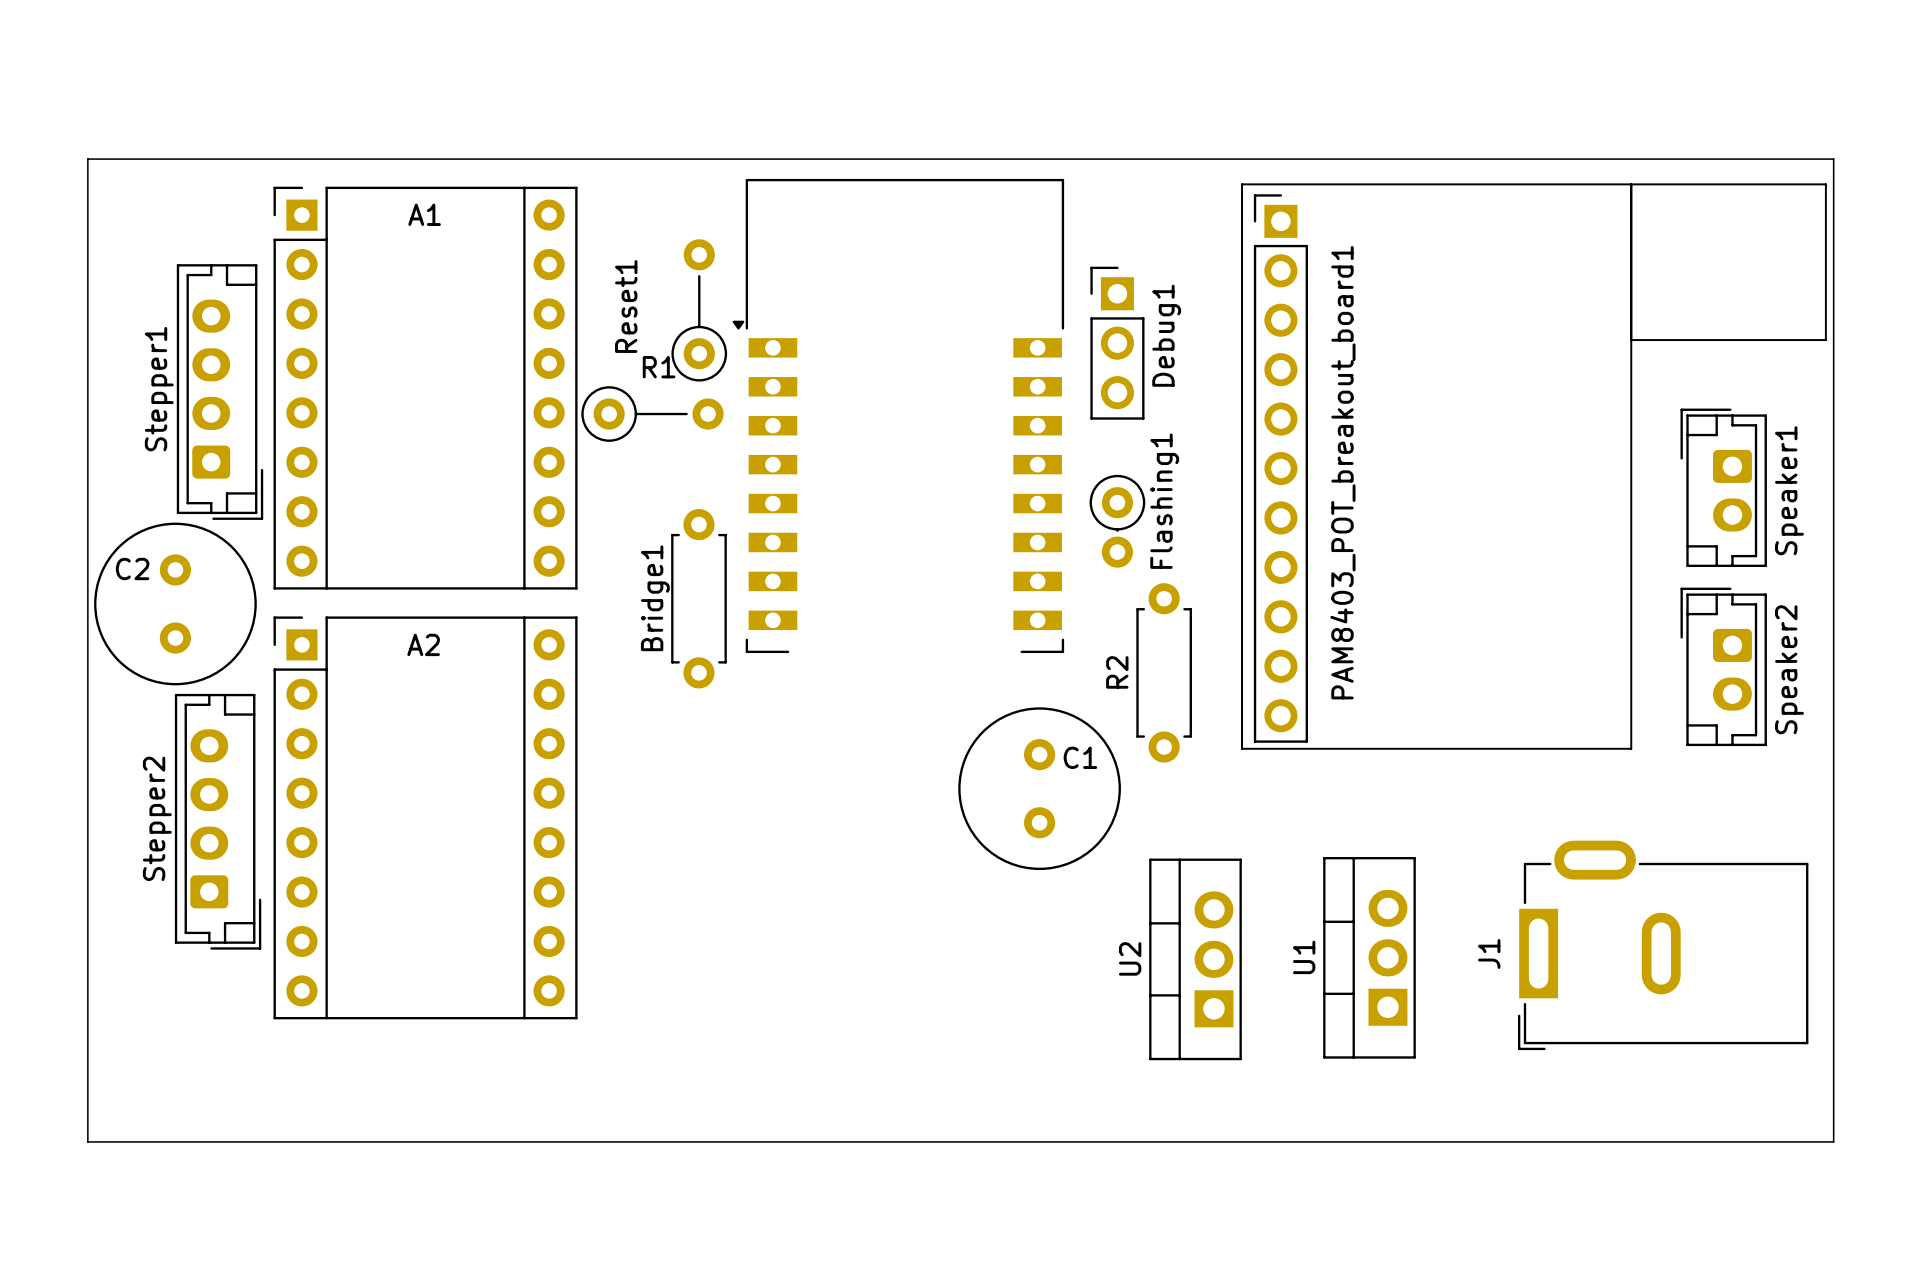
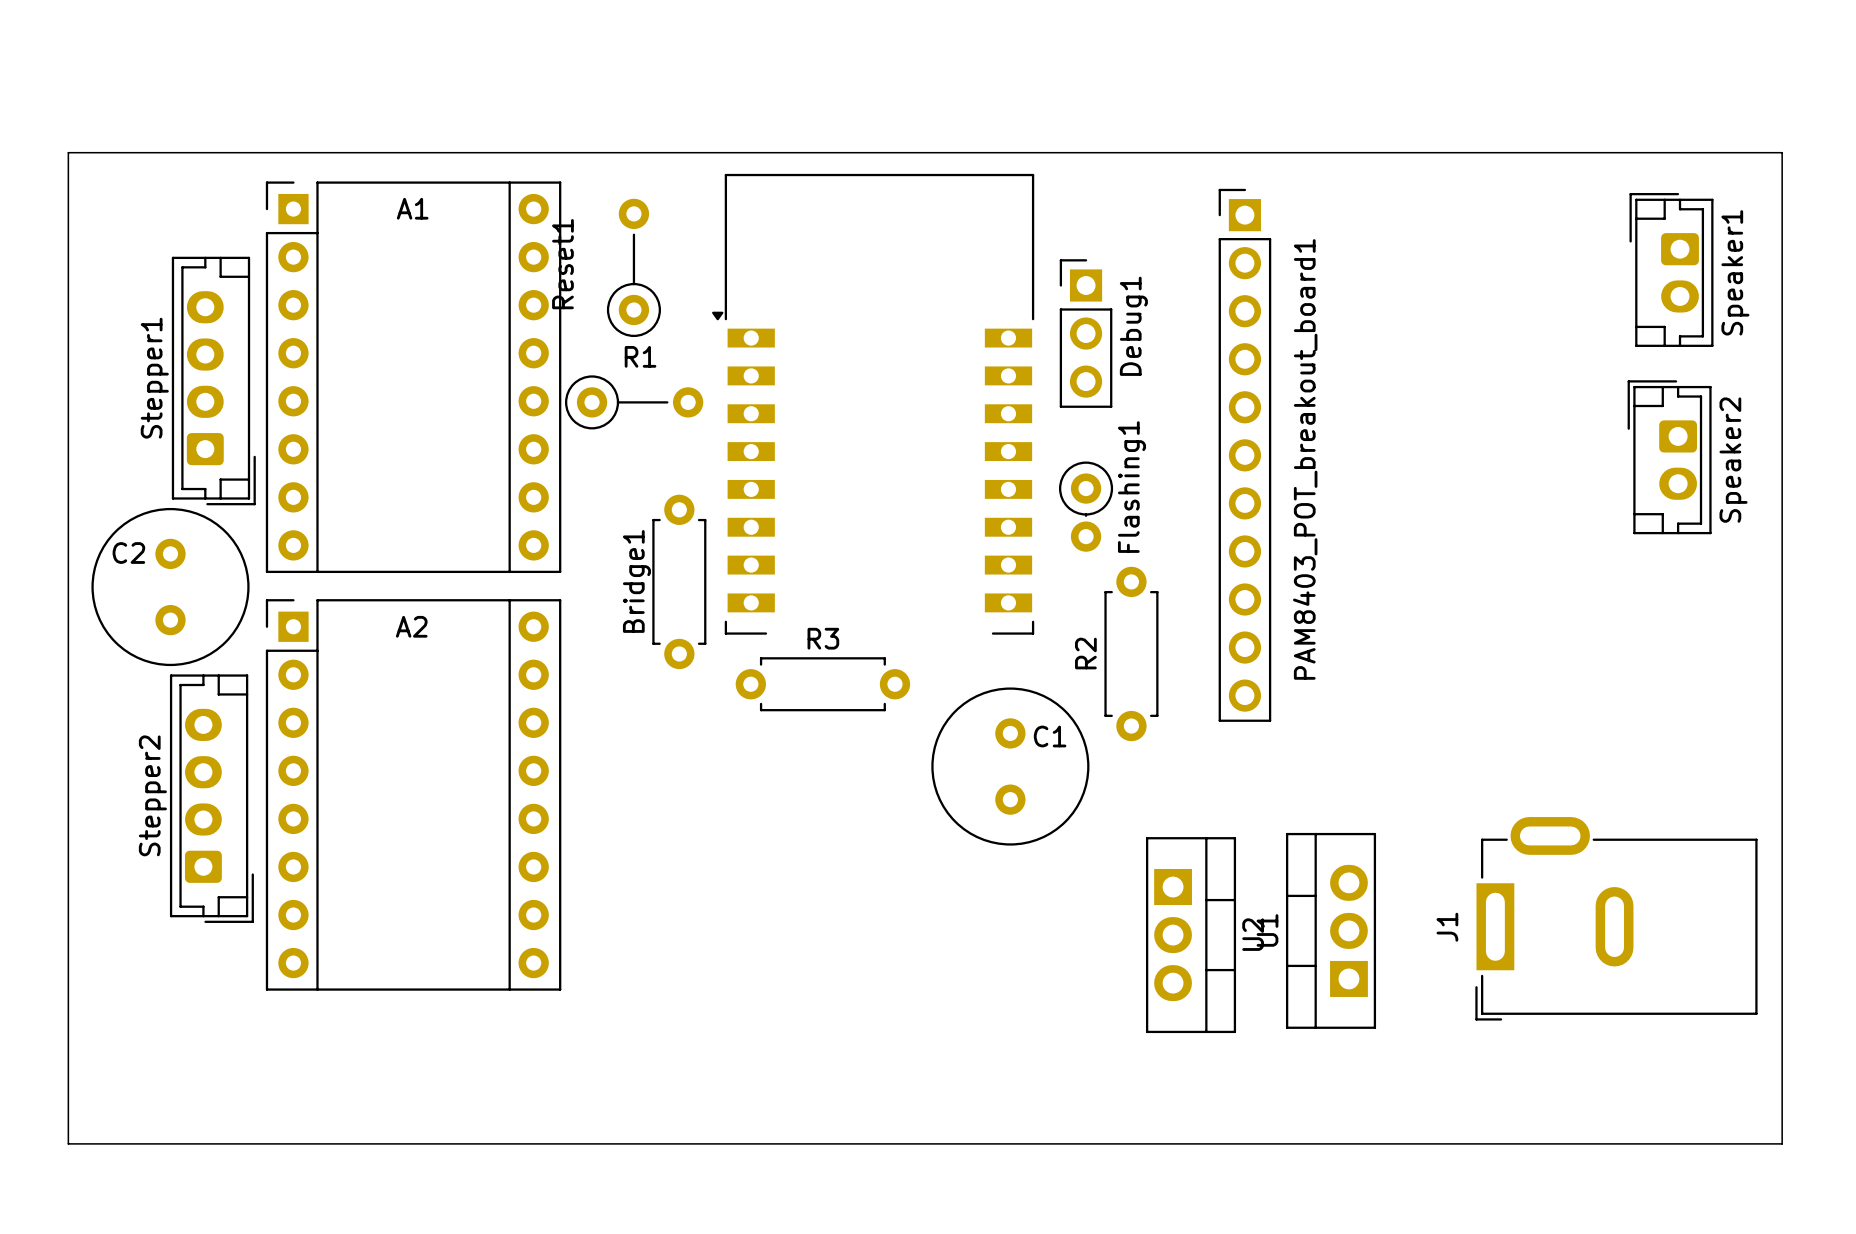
board edge: (1833, 159) (87, 159) (87, 1141) (1833, 1141) -> (1782, 154) (1782, 152) (68, 152) (68, 1143) (1782, 1143) (1782, 1109)
line: (1631, 184) (1631, 748) (1242, 748) (1242, 184) (1825, 184) (1825, 340) (1631, 340) -> none
Reset1 position: (699, 310) -> (633, 267)
Speaker1 position: (1723, 487) -> (1671, 269)
Speaker2 position: (1723, 666) -> (1669, 457)
R3: none -> (822, 684)
U2 rotation: 0° (1195, 959) -> 180° (1191, 935)

